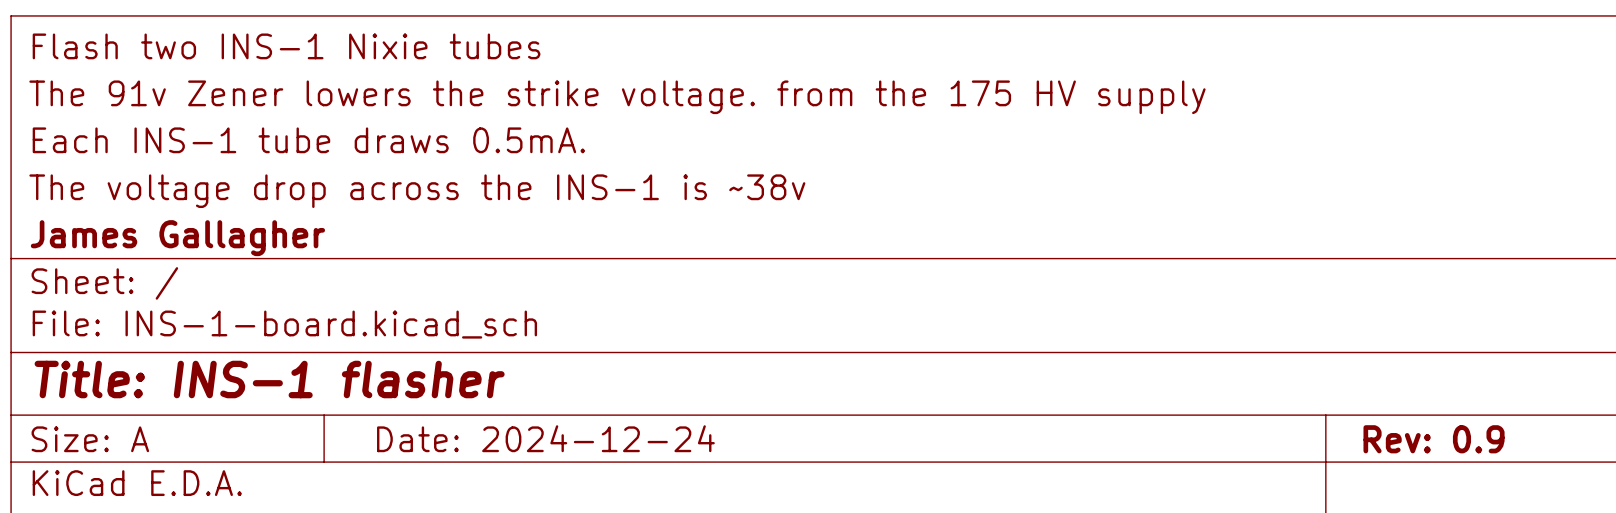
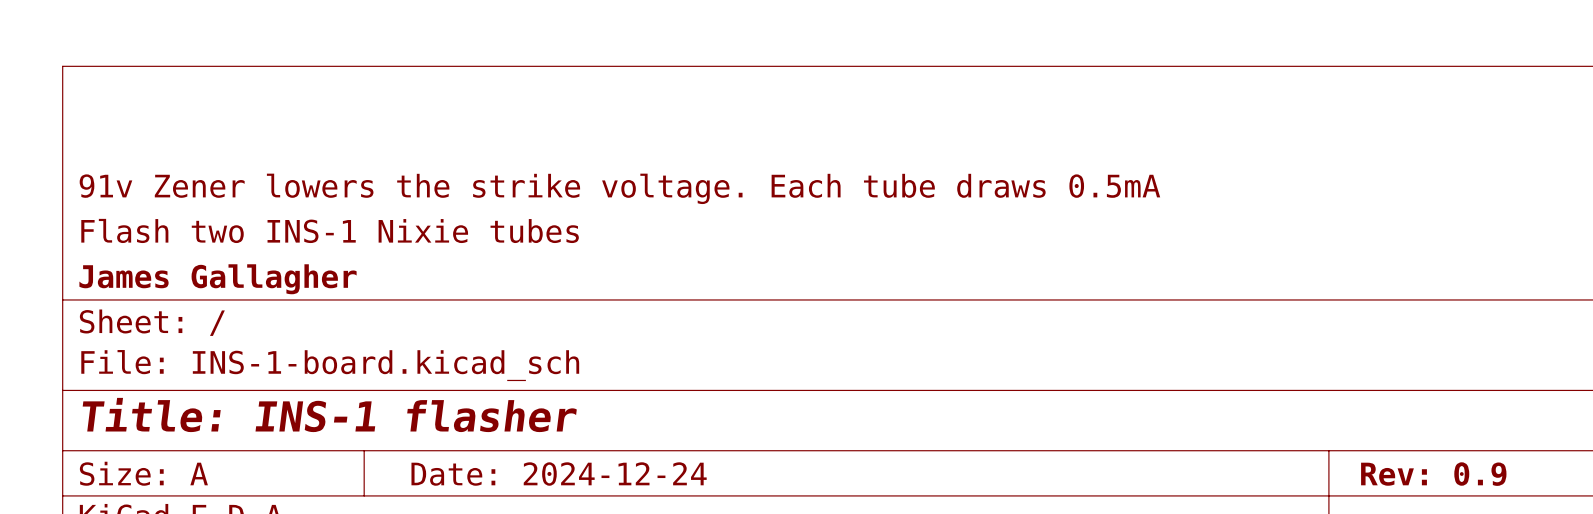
title block: Flash two INS-1 Nixie tubes (286, 46) -> none
title block: The 91v Zener lowers the strike voltage. from the 175 HV supply (617, 97) -> none
title block: Each INS-1 tube draws 0.5mA. (308, 140) -> 91v Zener lowers the strike voltage. Each tube draws 0.5mA (619, 188)
title block: The voltage drop across the INS-1 is ~38v (417, 191) -> Flash two INS-1 Nixie tubes (330, 230)

